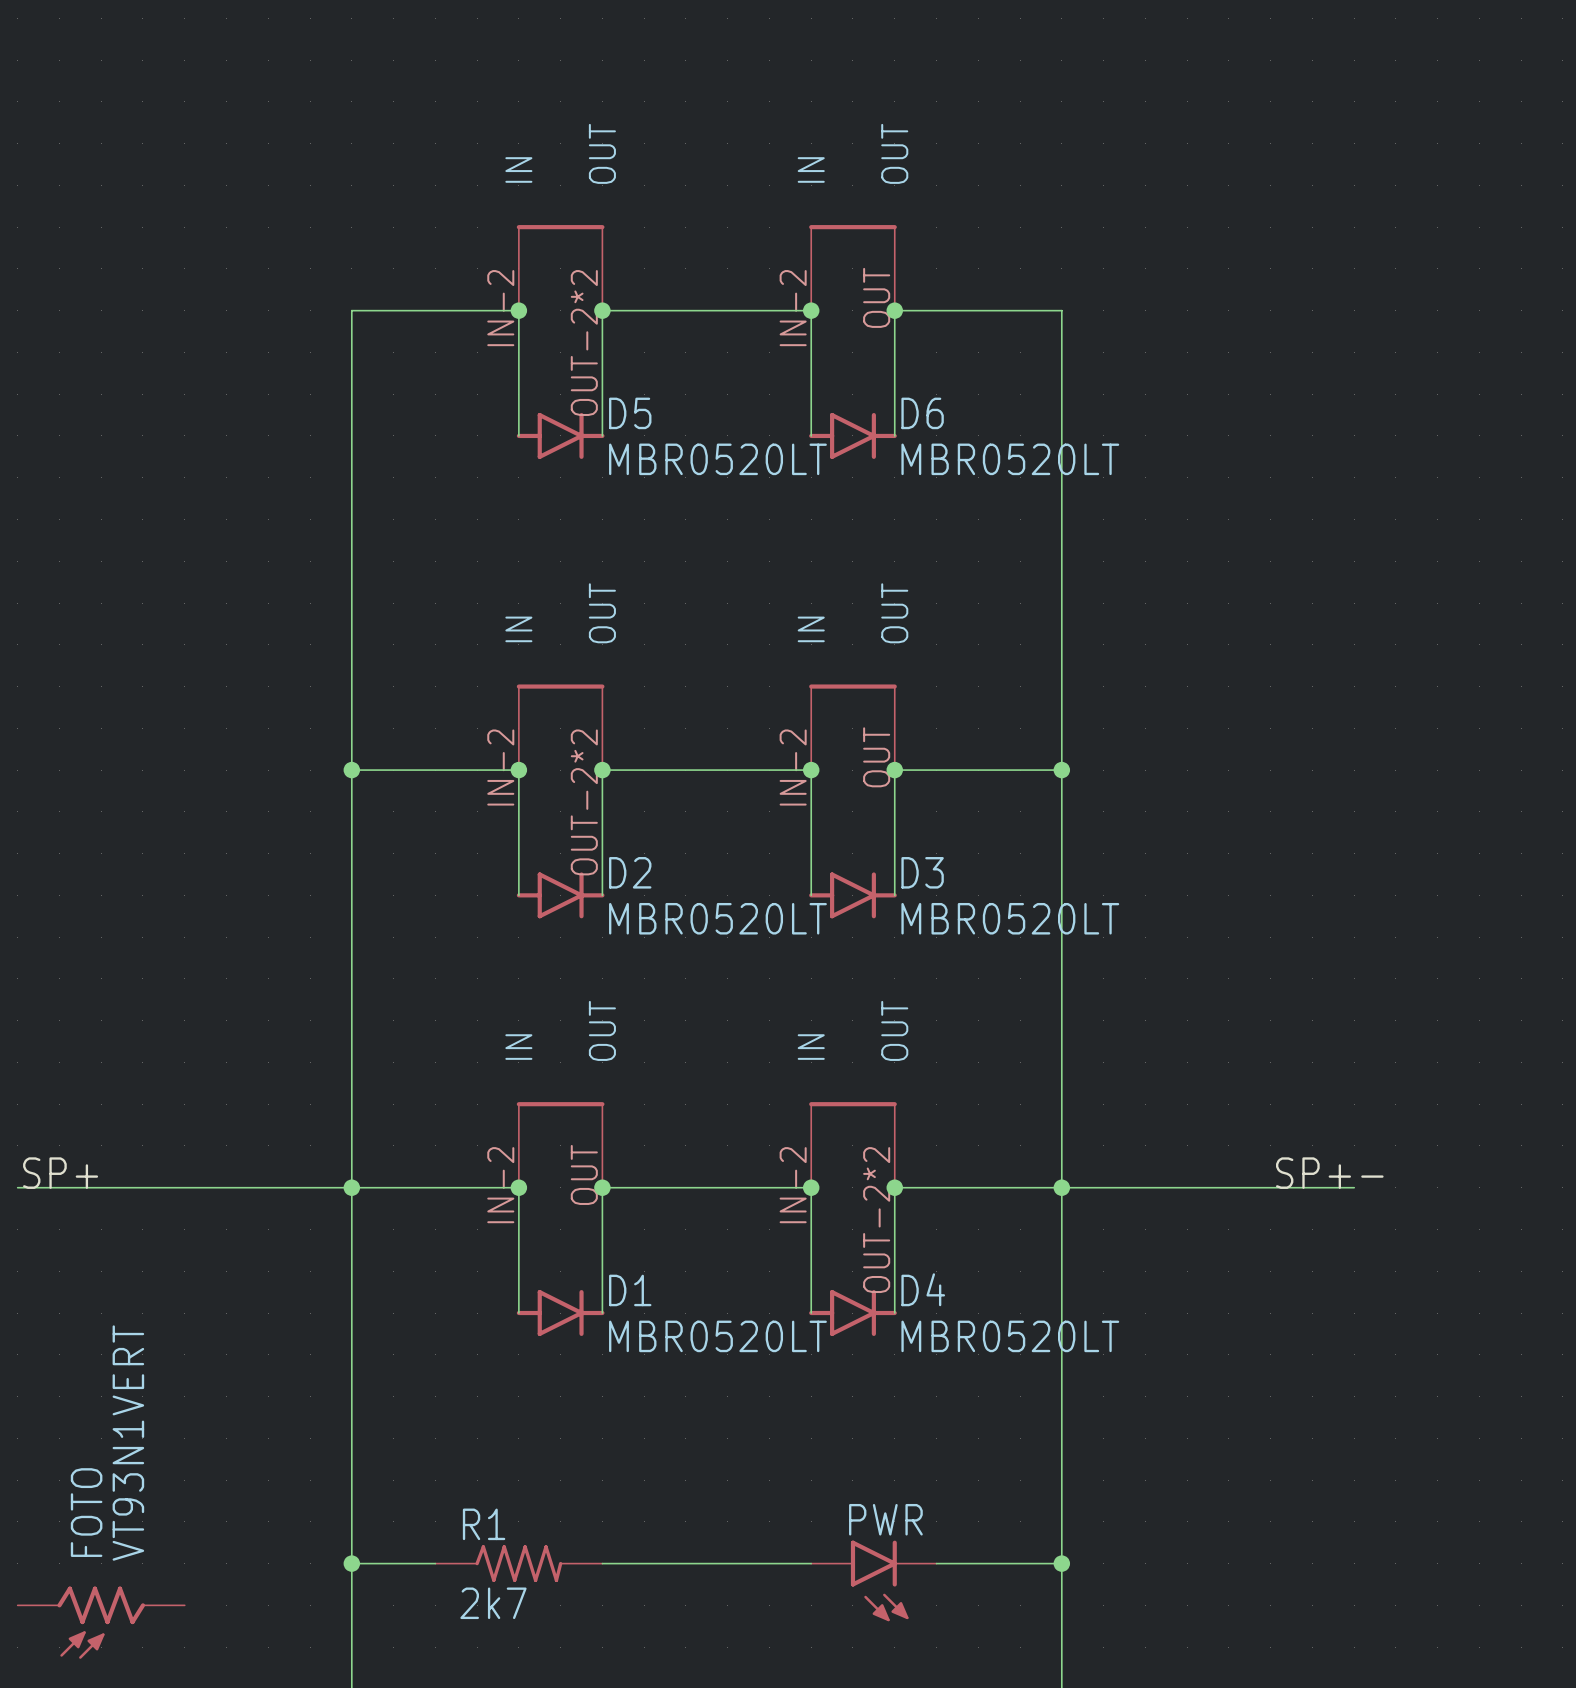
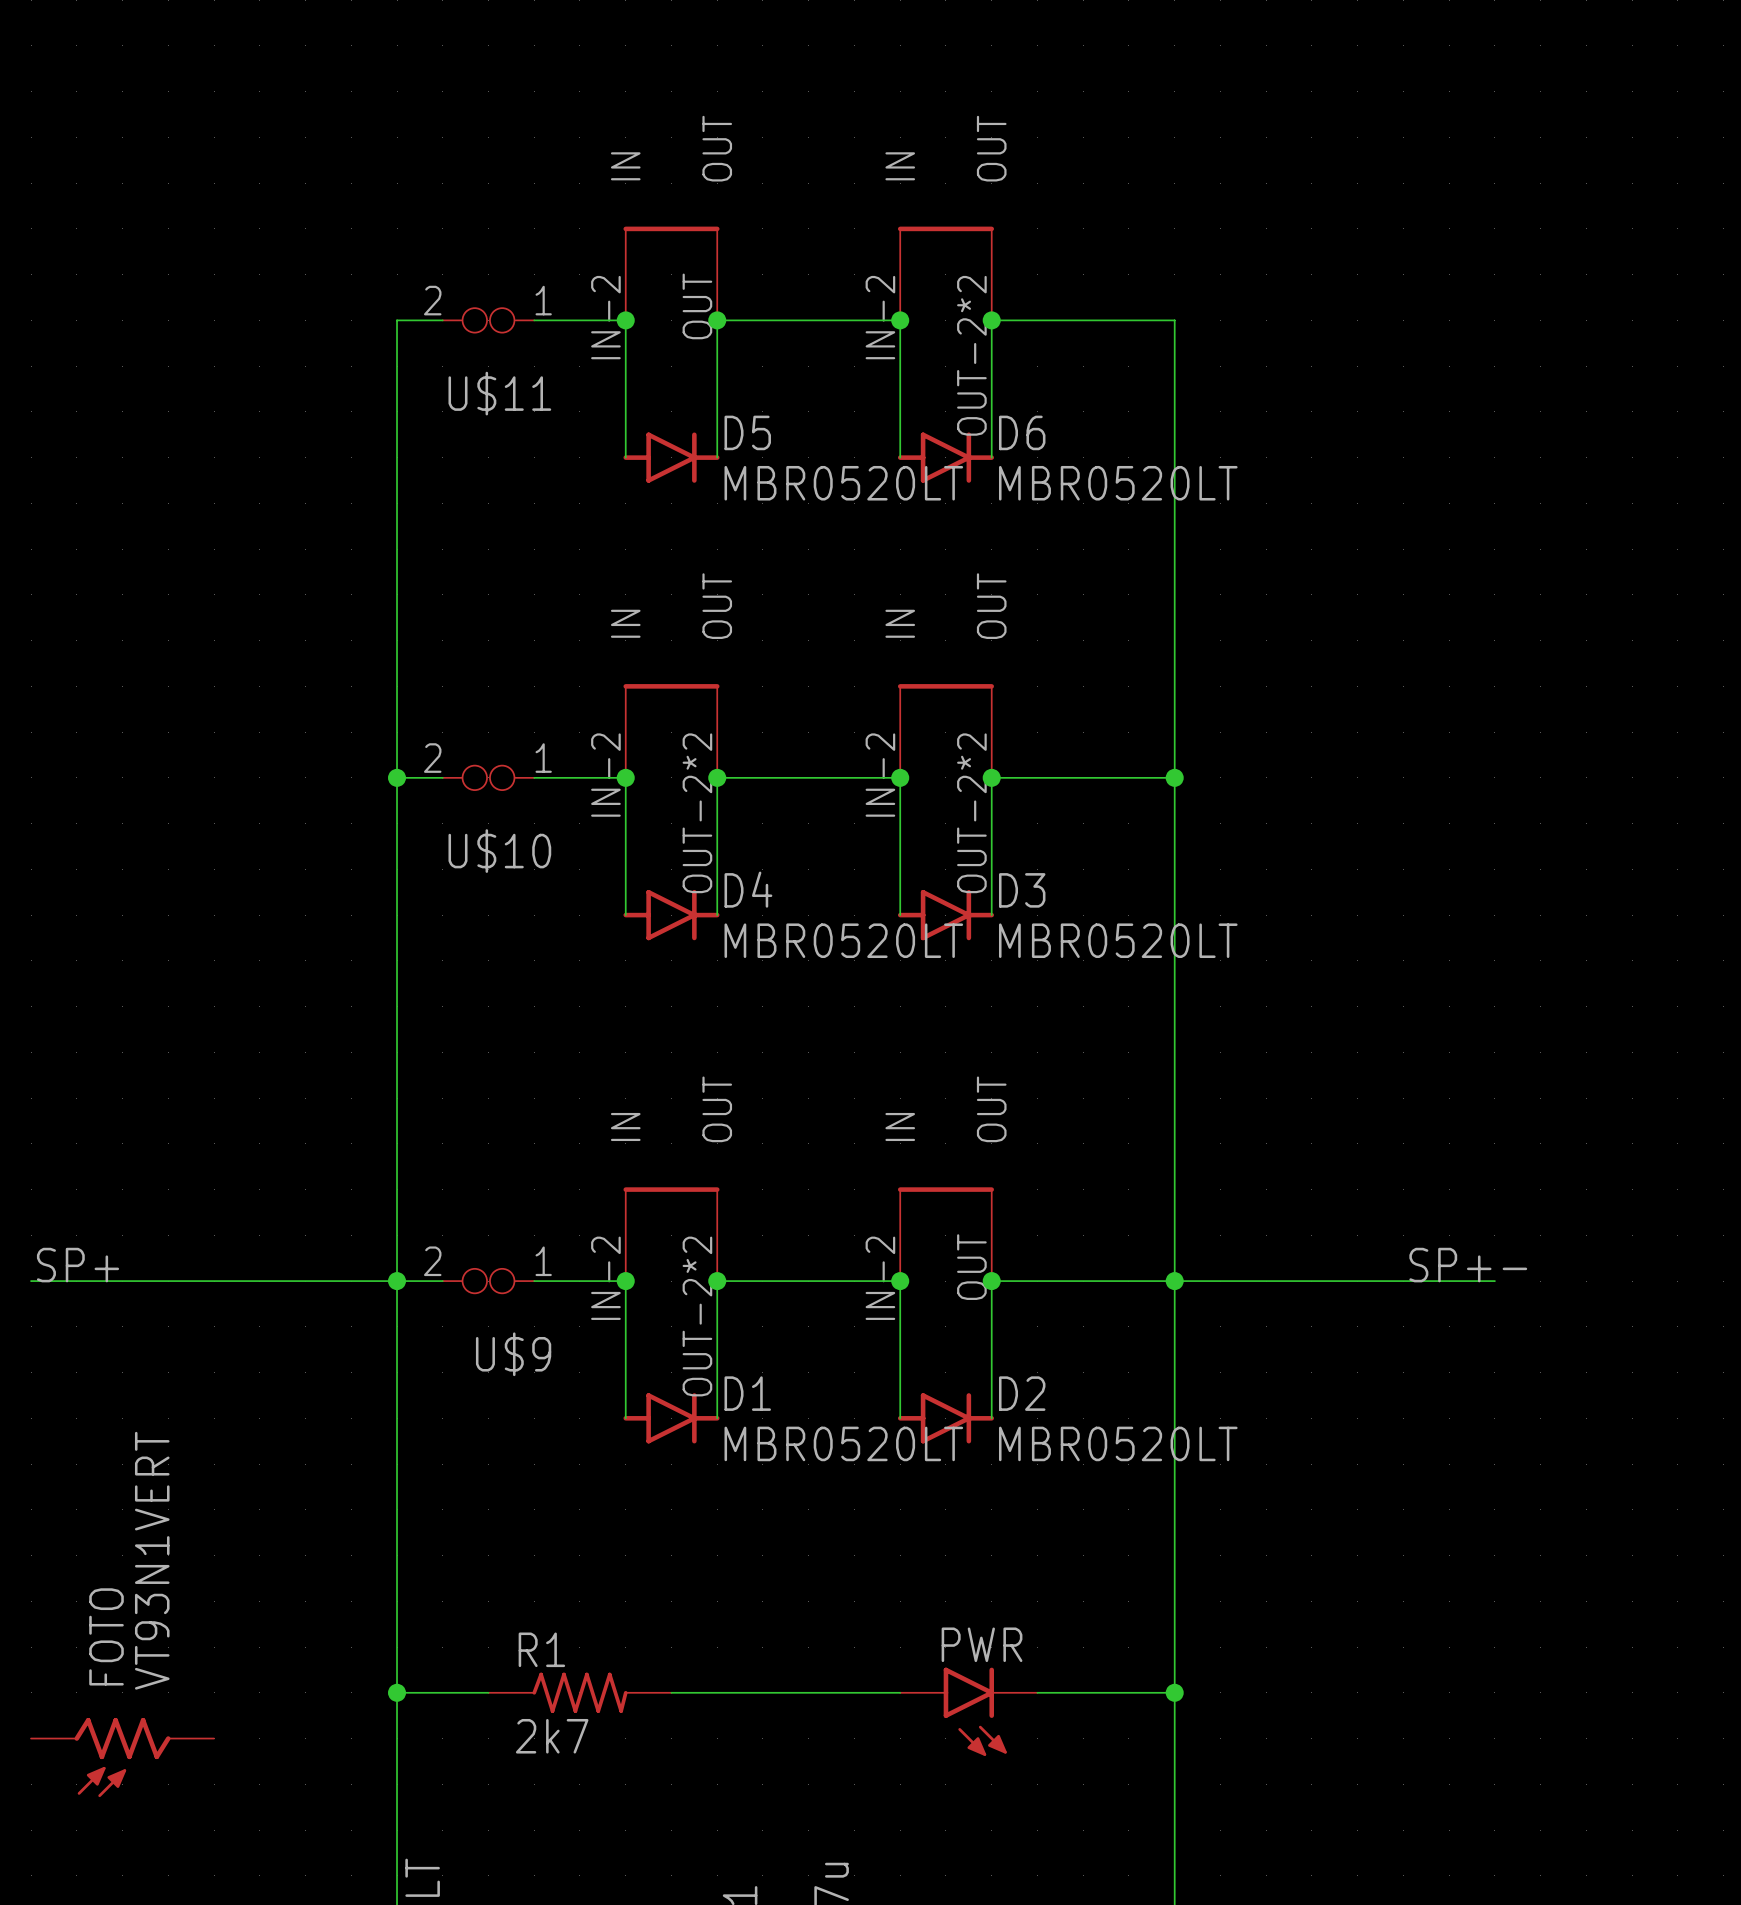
part: (560, 267) -> none
part: none -> (671, 273)
part pin number: OUT (876, 297) -> OUT-2*2 (971, 355)
wire: (393, 310) (477, 310) -> none
U$11: none -> (488, 320)
wire: (518, 310) (518, 435) -> (579, 320) (625, 320) (625, 457)
junction: (518, 310) -> none
junction: none -> (625, 320)
junction: (602, 310) -> none
wire: (644, 310) (602, 310) (602, 435) -> (717, 320) (717, 457)
junction: none -> (717, 320)
D5 position: (560, 435) -> (671, 457)
part: none -> (945, 730)
part position: (560, 727) -> (671, 730)
part: (852, 727) -> none
wire: none -> (397, 777) (442, 777)
U$10: none -> (488, 777)
wire: none -> (534, 777) (625, 777) (625, 915)
junction: none -> (625, 777)
junction: none -> (717, 777)
wire: (351, 770) (518, 770) (518, 895) -> none
junction position: (351, 770) -> (397, 777)
junction: (518, 770) -> none
junction: (602, 770) -> none
wire: (811, 770) (602, 770) (602, 895) -> (900, 823) (900, 777) (717, 777) (717, 915)
junction position: (811, 770) -> (900, 777)
wire: (894, 770) (1061, 770) -> (991, 823) (991, 777) (1174, 777)
junction position: (894, 770) -> (991, 777)
junction position: (1061, 770) -> (1174, 777)
D4: none -> MBR0520LT (671, 915)
wire: (811, 853) (811, 895) -> none
wire: (894, 853) (894, 895) -> none
D2: MBR0520LT (560, 895) -> none
D3 position: (852, 895) -> (945, 915)
part: (560, 1144) -> none
part: none -> (671, 1234)
wire: (393, 1187) (477, 1187) -> none
U$9: none -> (488, 1281)
wire: (518, 1187) (518, 1313) -> (579, 1281) (625, 1281) (625, 1418)
junction: (518, 1187) -> none
junction: none -> (625, 1281)
junction: (602, 1187) -> none
wire: (644, 1187) (602, 1187) (602, 1313) -> (717, 1281) (717, 1418)
junction: none -> (717, 1281)
part pin number: OUT-2*2 (876, 1220) -> OUT (971, 1267)
D4 name: D4 (923, 1289) -> D2 (1022, 1393)
D1 position: (560, 1313) -> (671, 1418)

